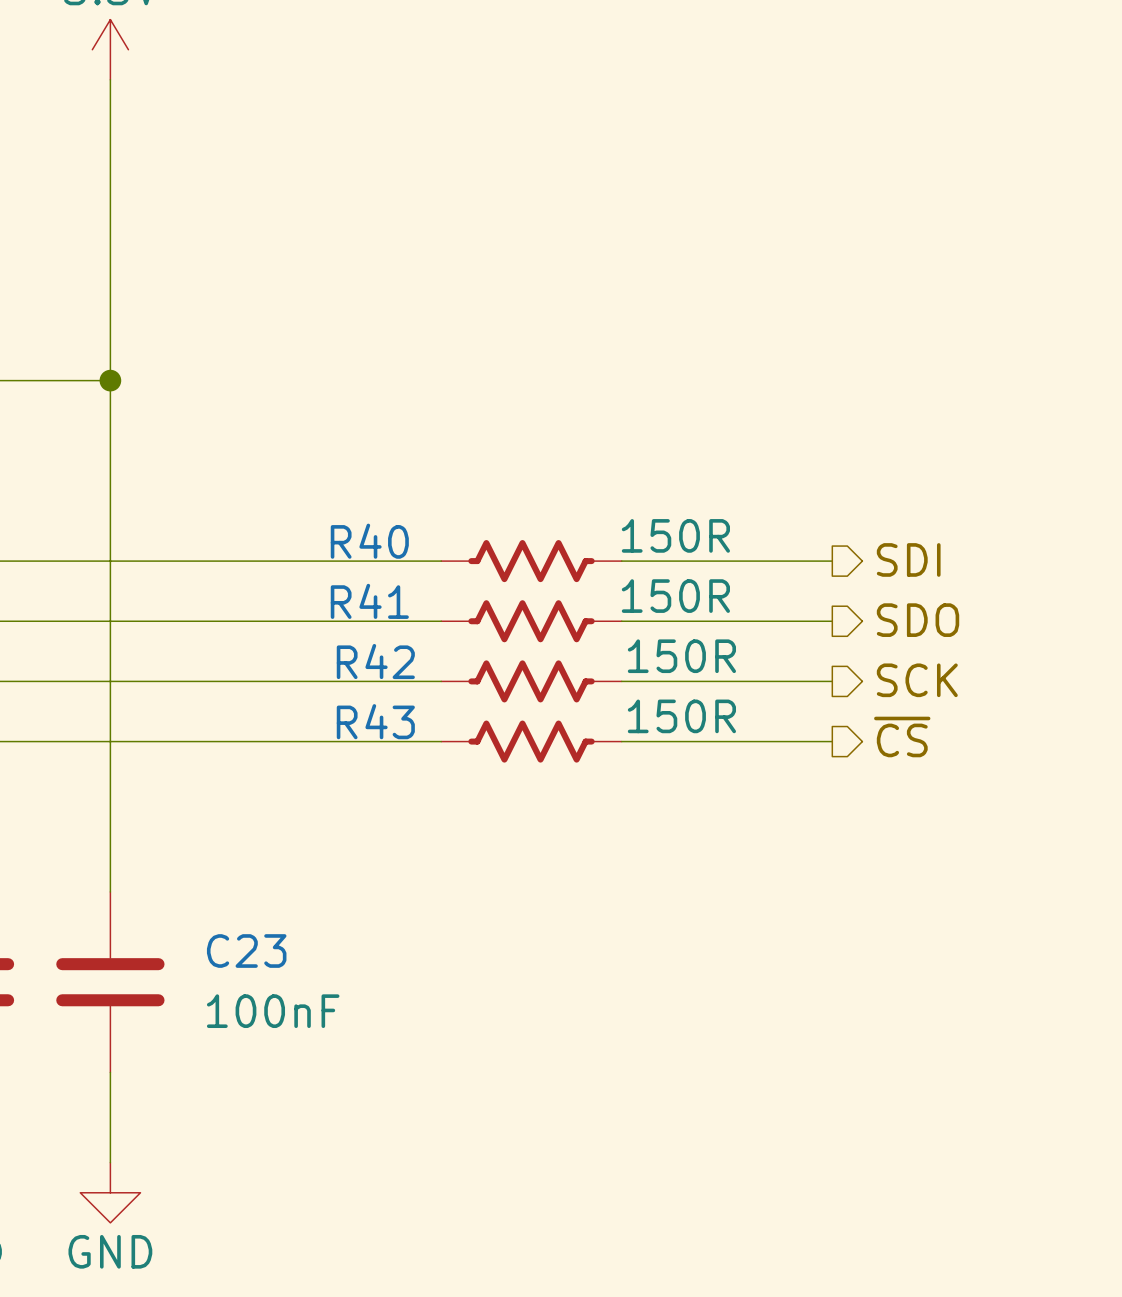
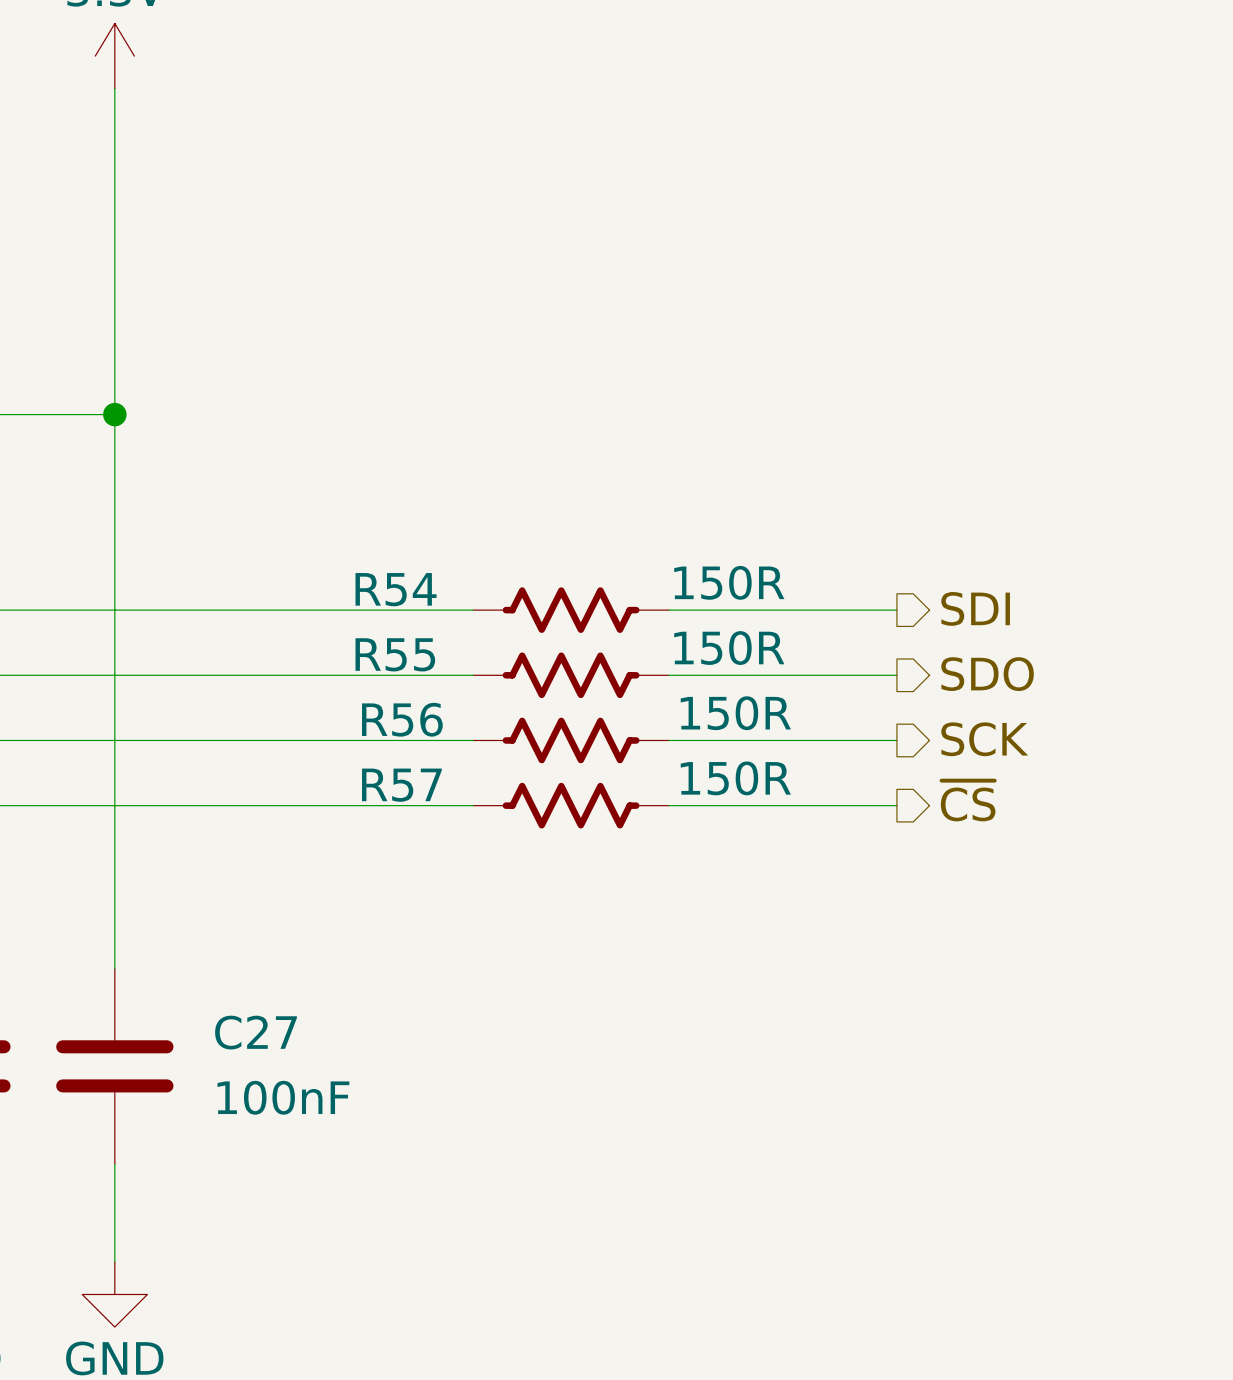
R40 name: R40 (369, 541) -> R54 (396, 589)
R41 name: R41 (369, 601) -> R55 (395, 654)
R42 name: R42 (375, 661) -> R56 (402, 719)
R43 name: R43 (375, 721) -> R57 (401, 785)
C23 name: C23 (246, 951) -> C27 (255, 1032)

